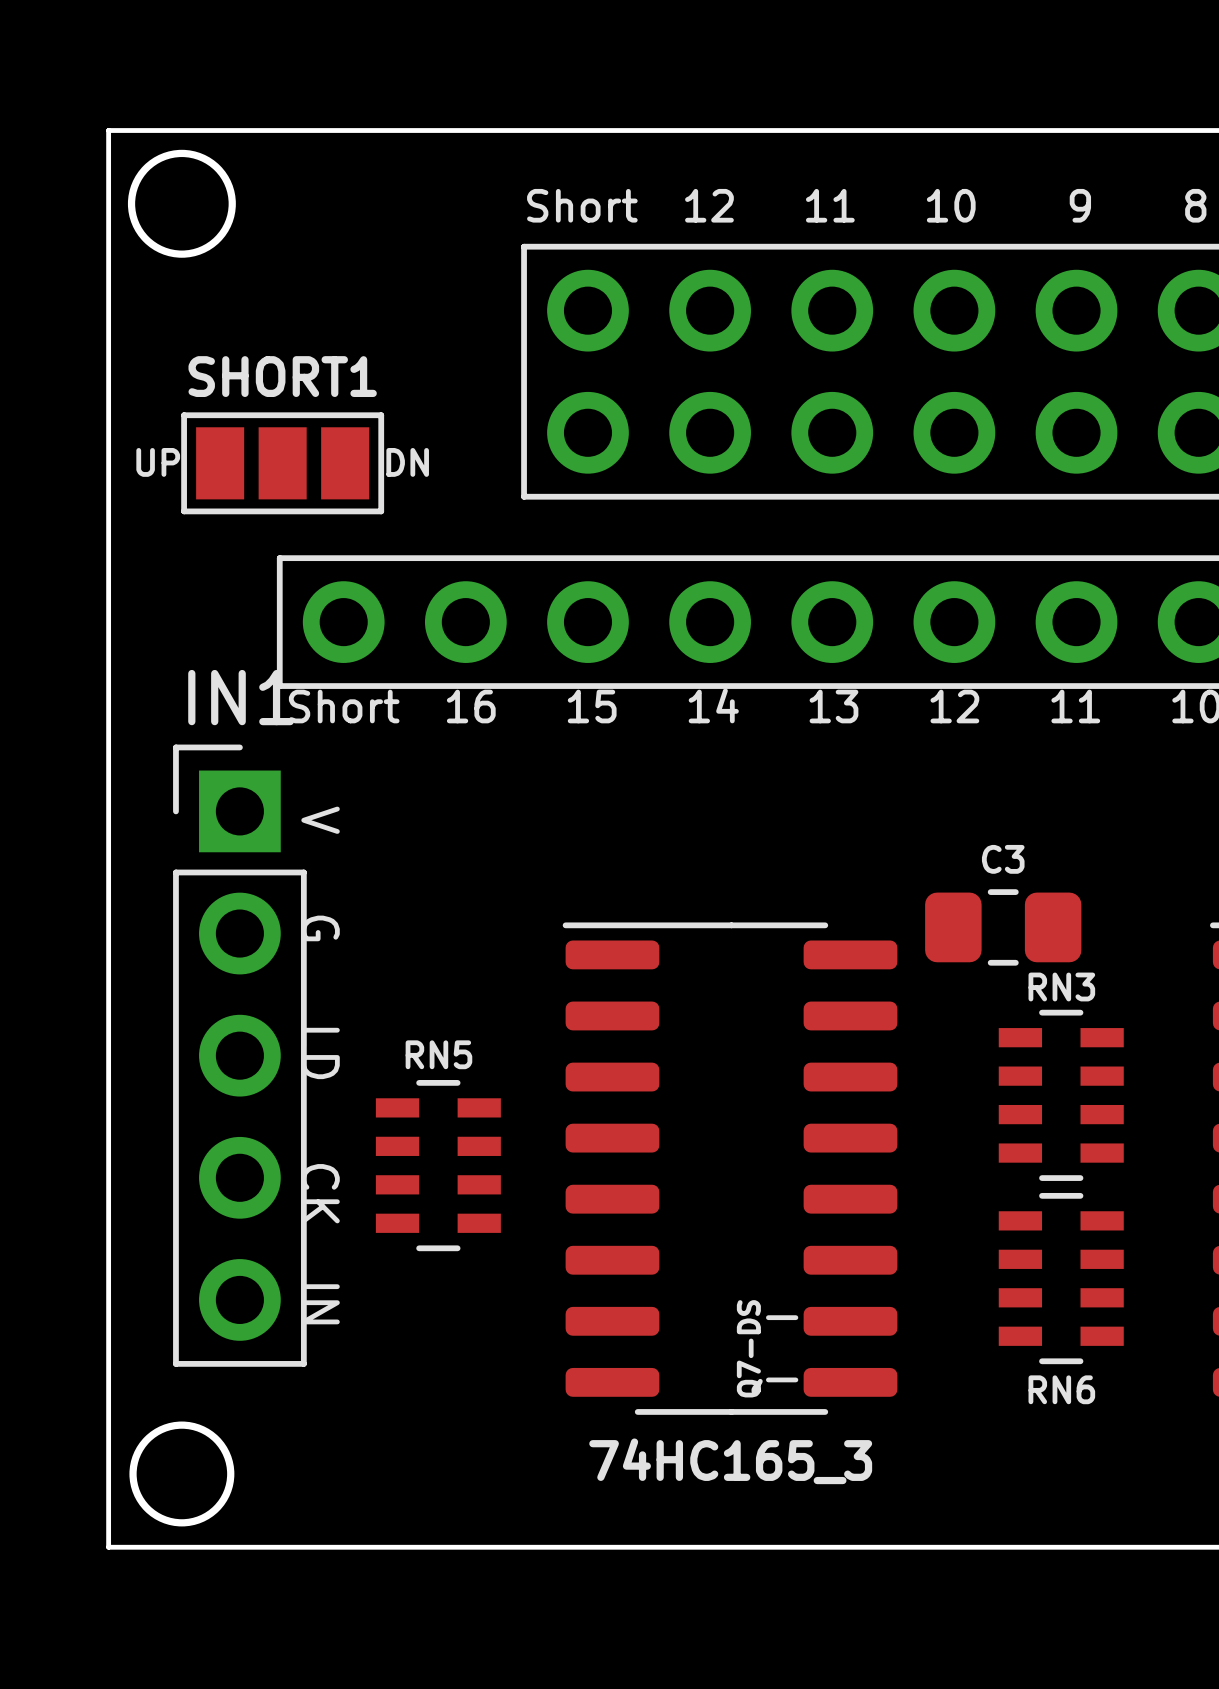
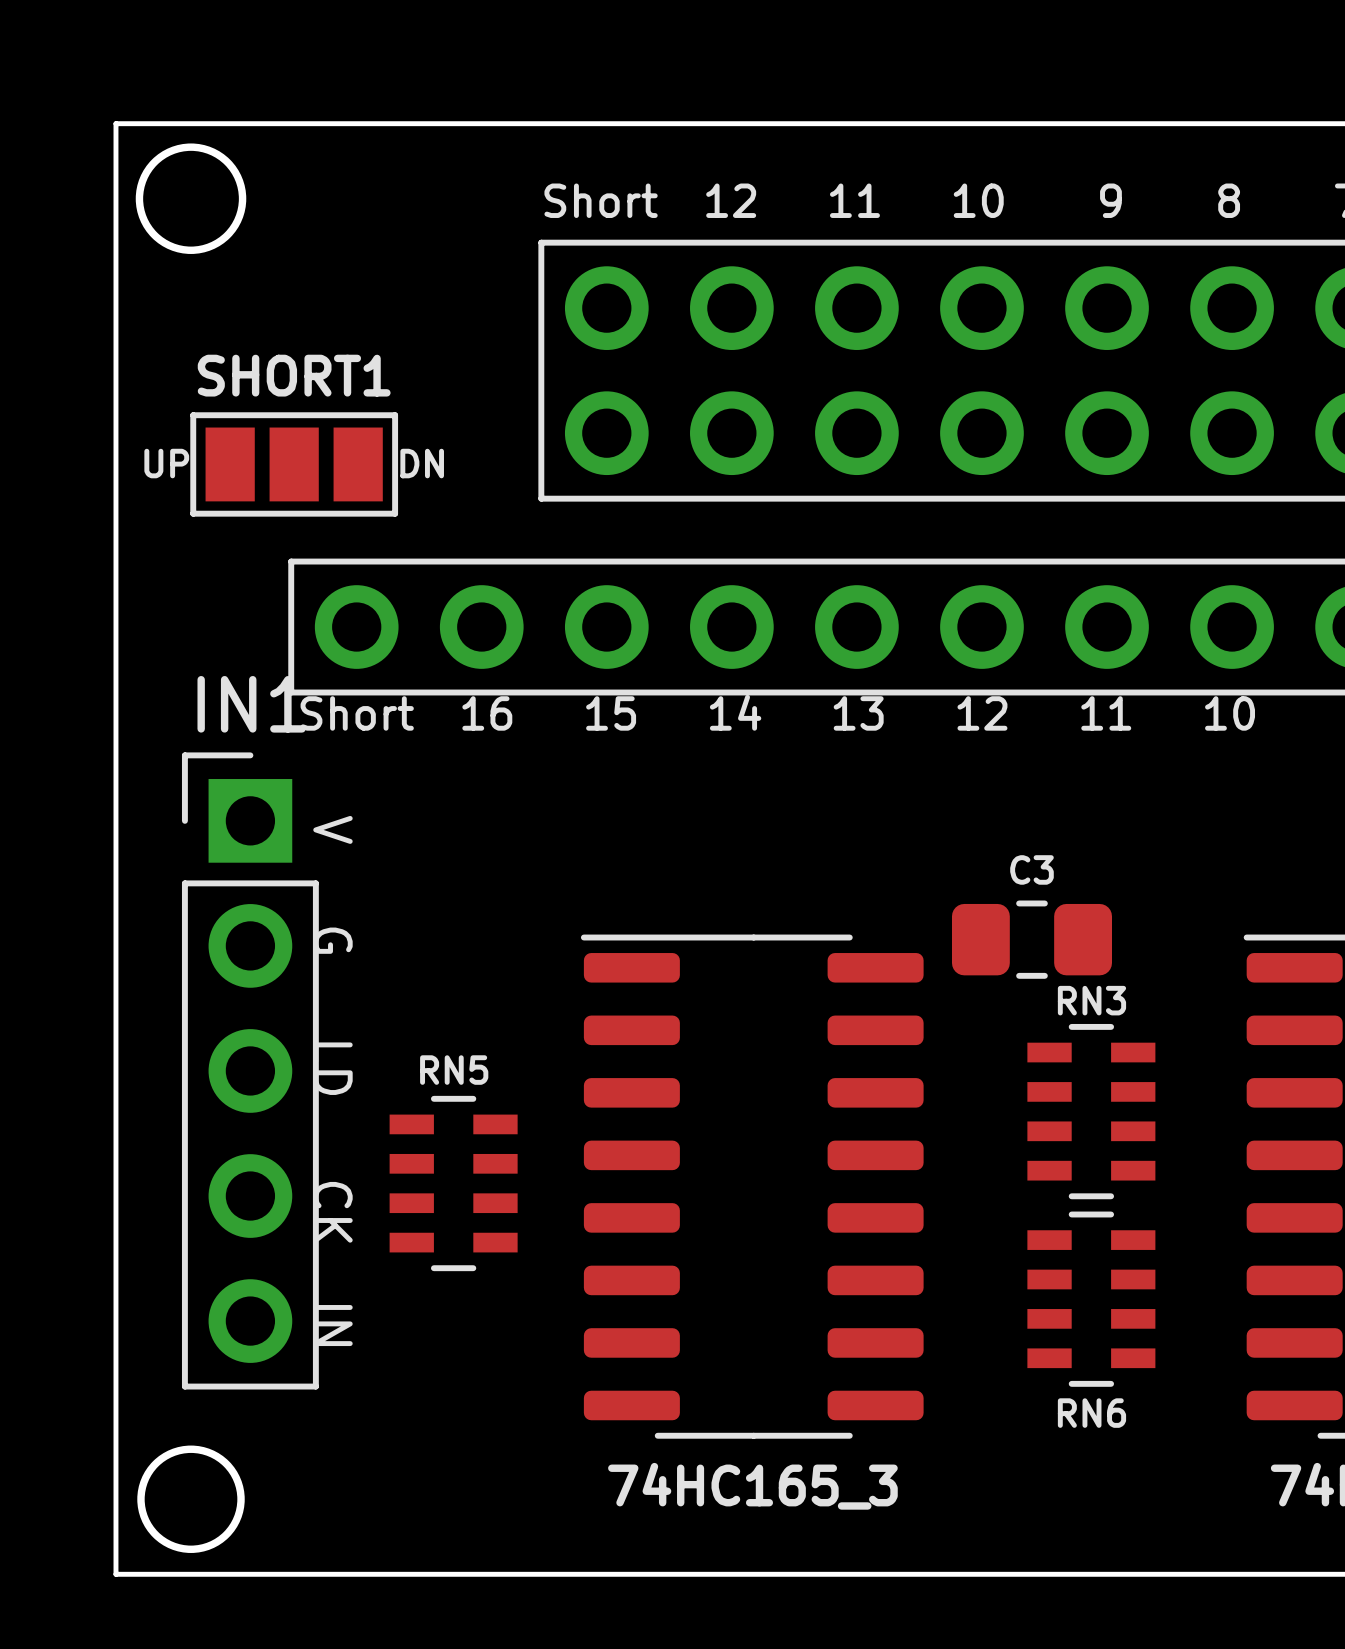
text: Q7-DS (749, 1348) -> none
text: | | (782, 1348) -> none

